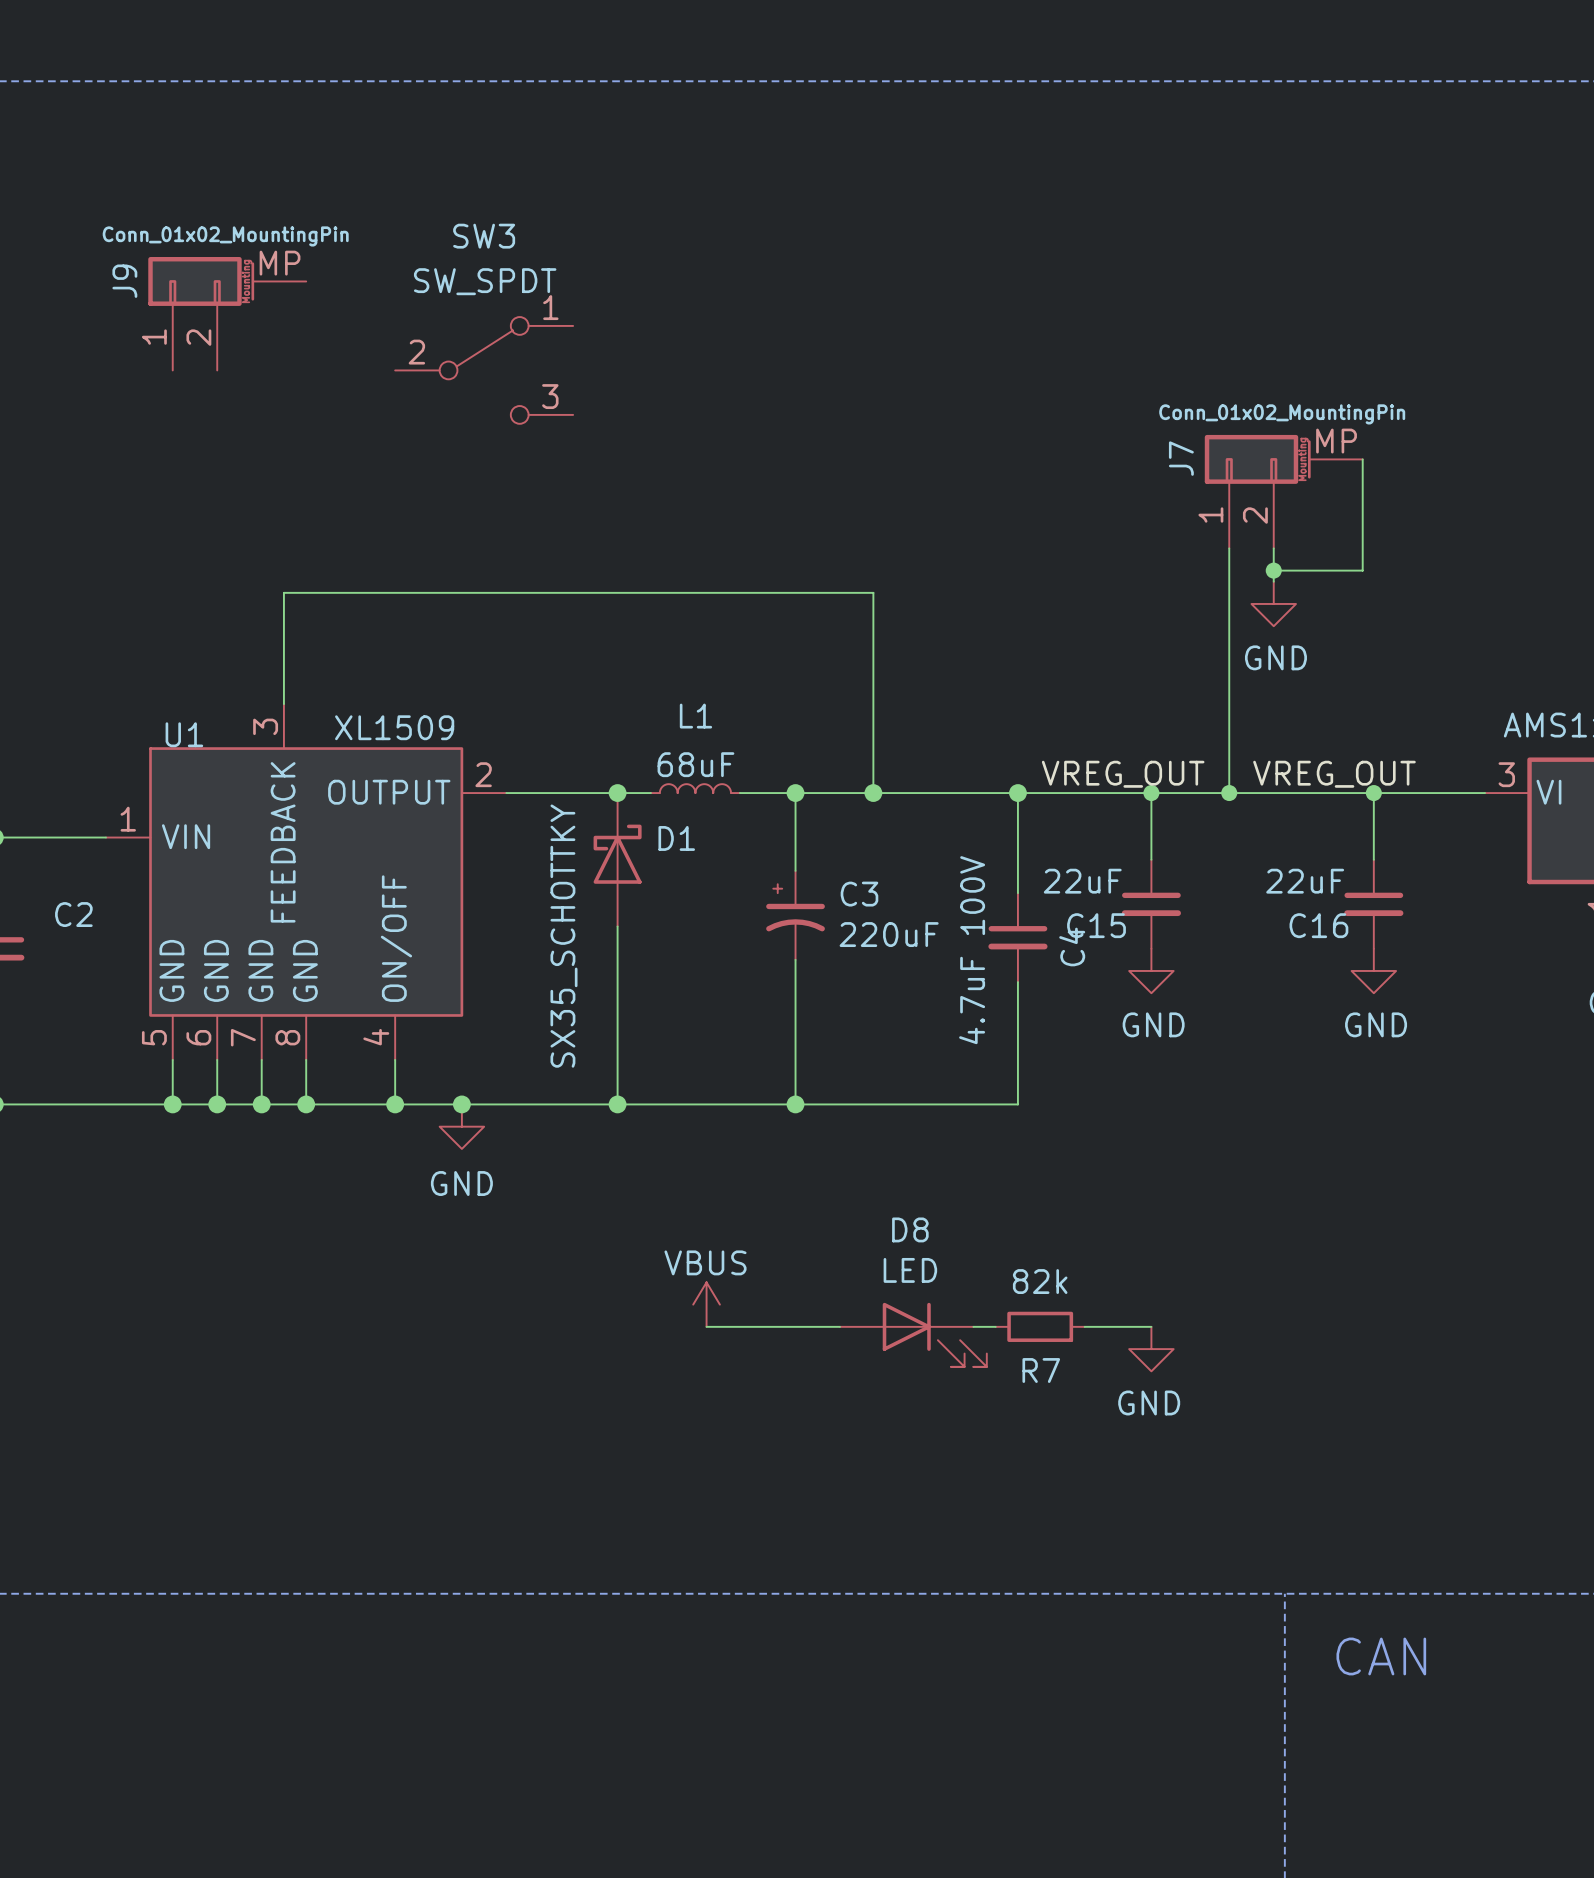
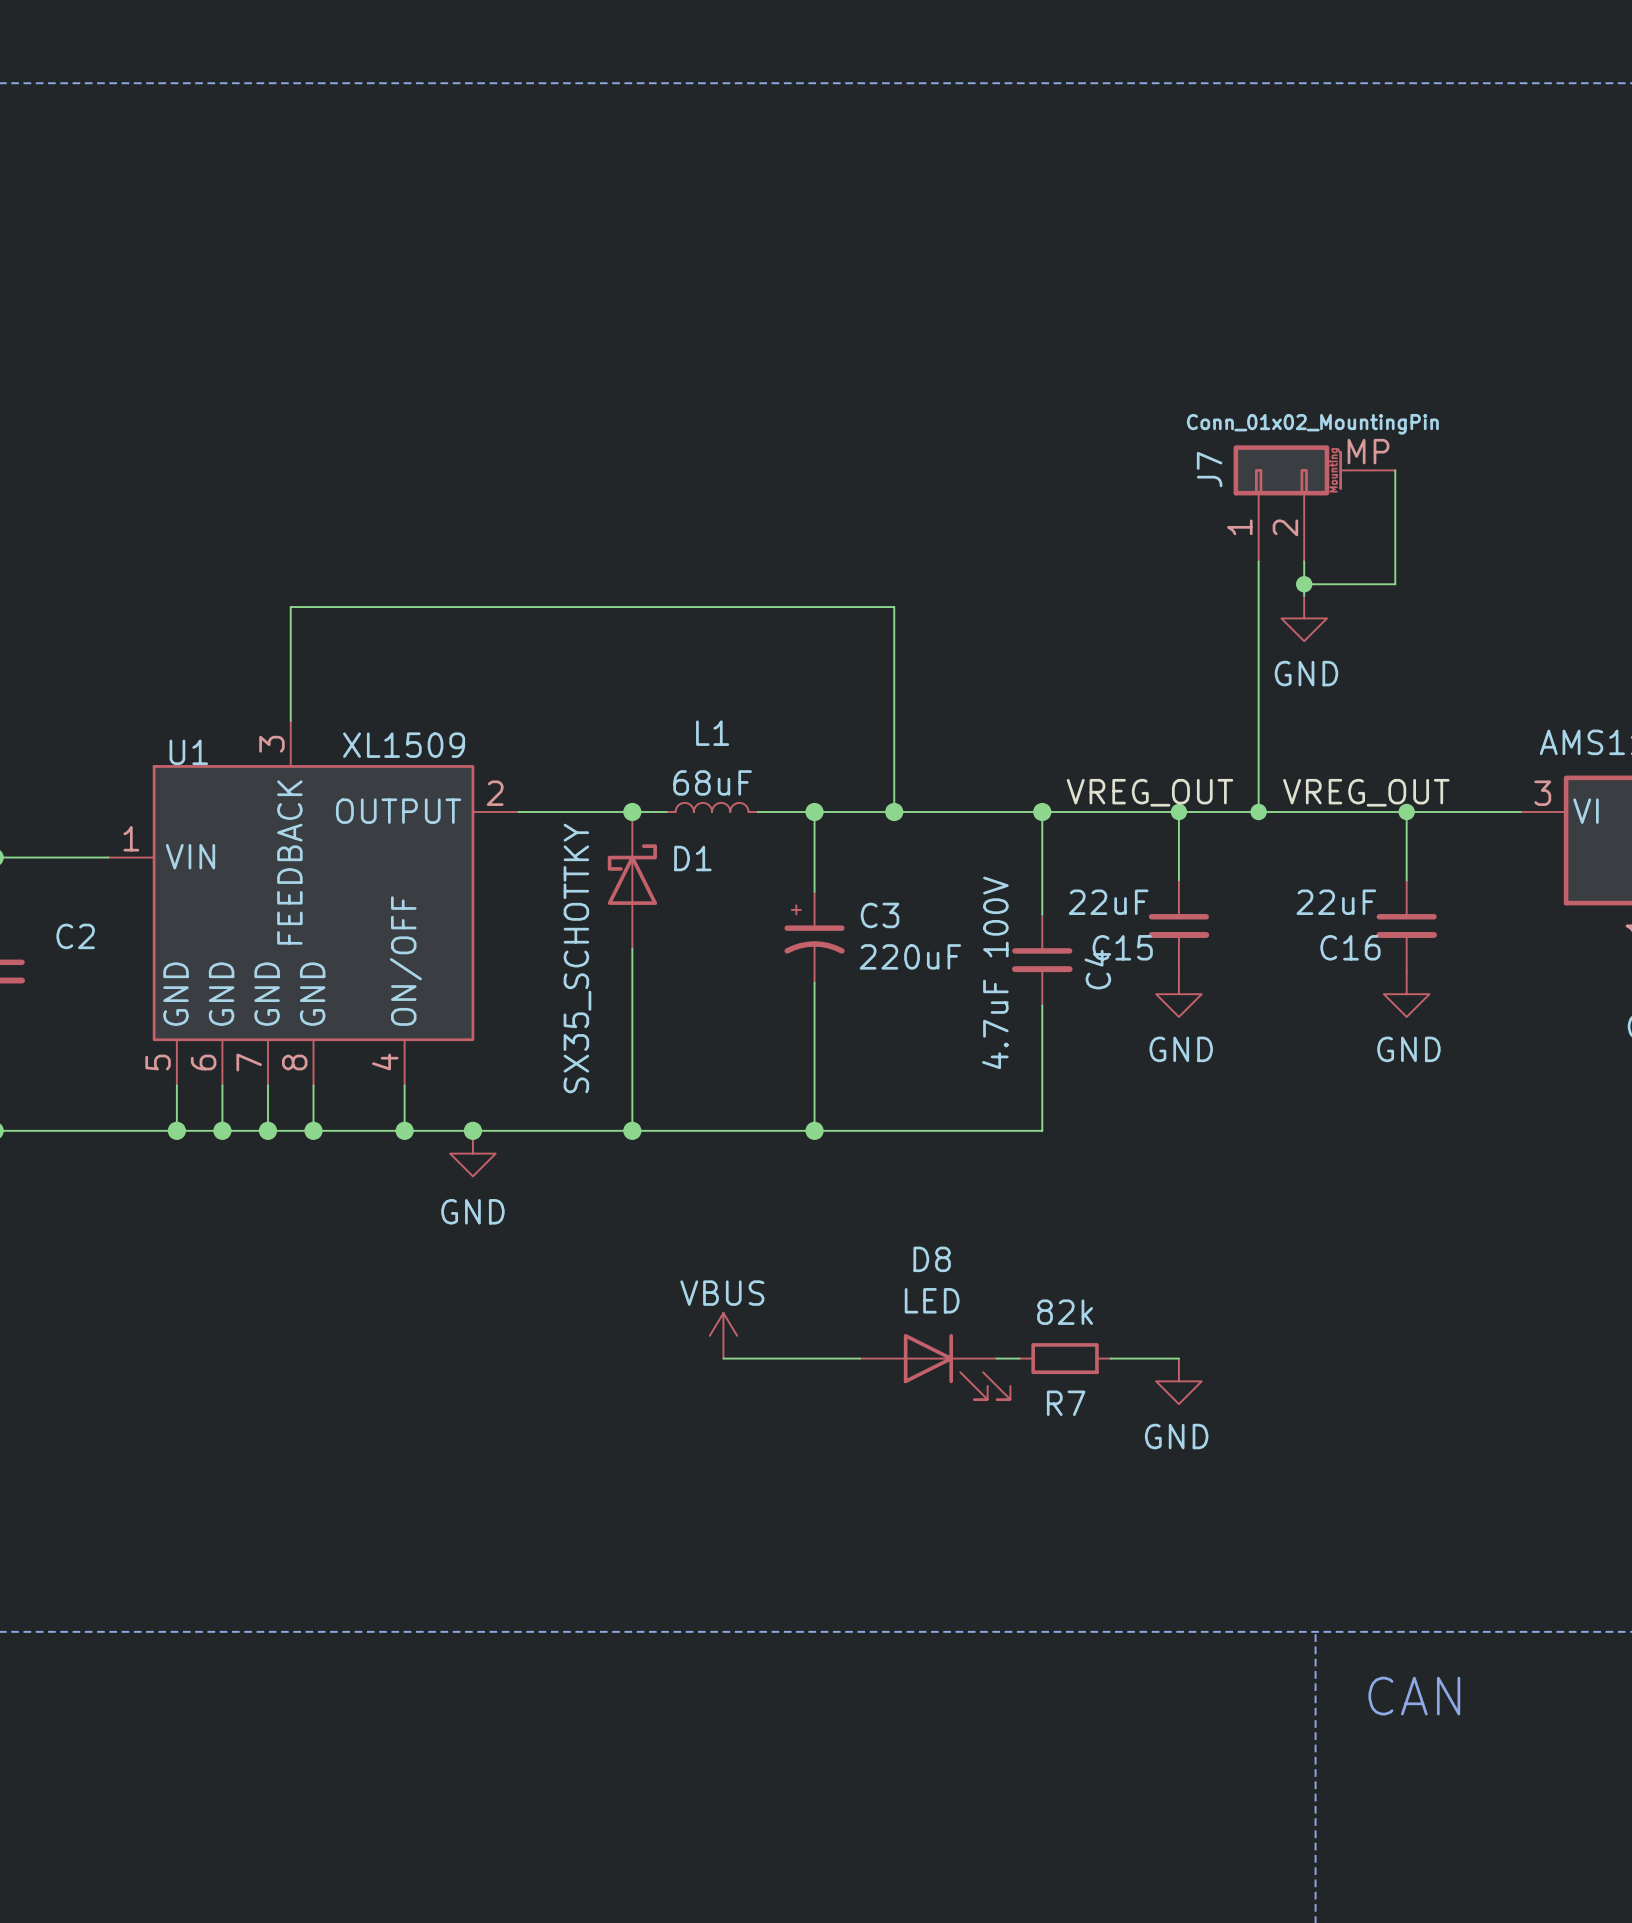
J9: Conn_01x02_MountingPin (227, 313) -> none
SW3: SW_SPDT (484, 370) -> none

